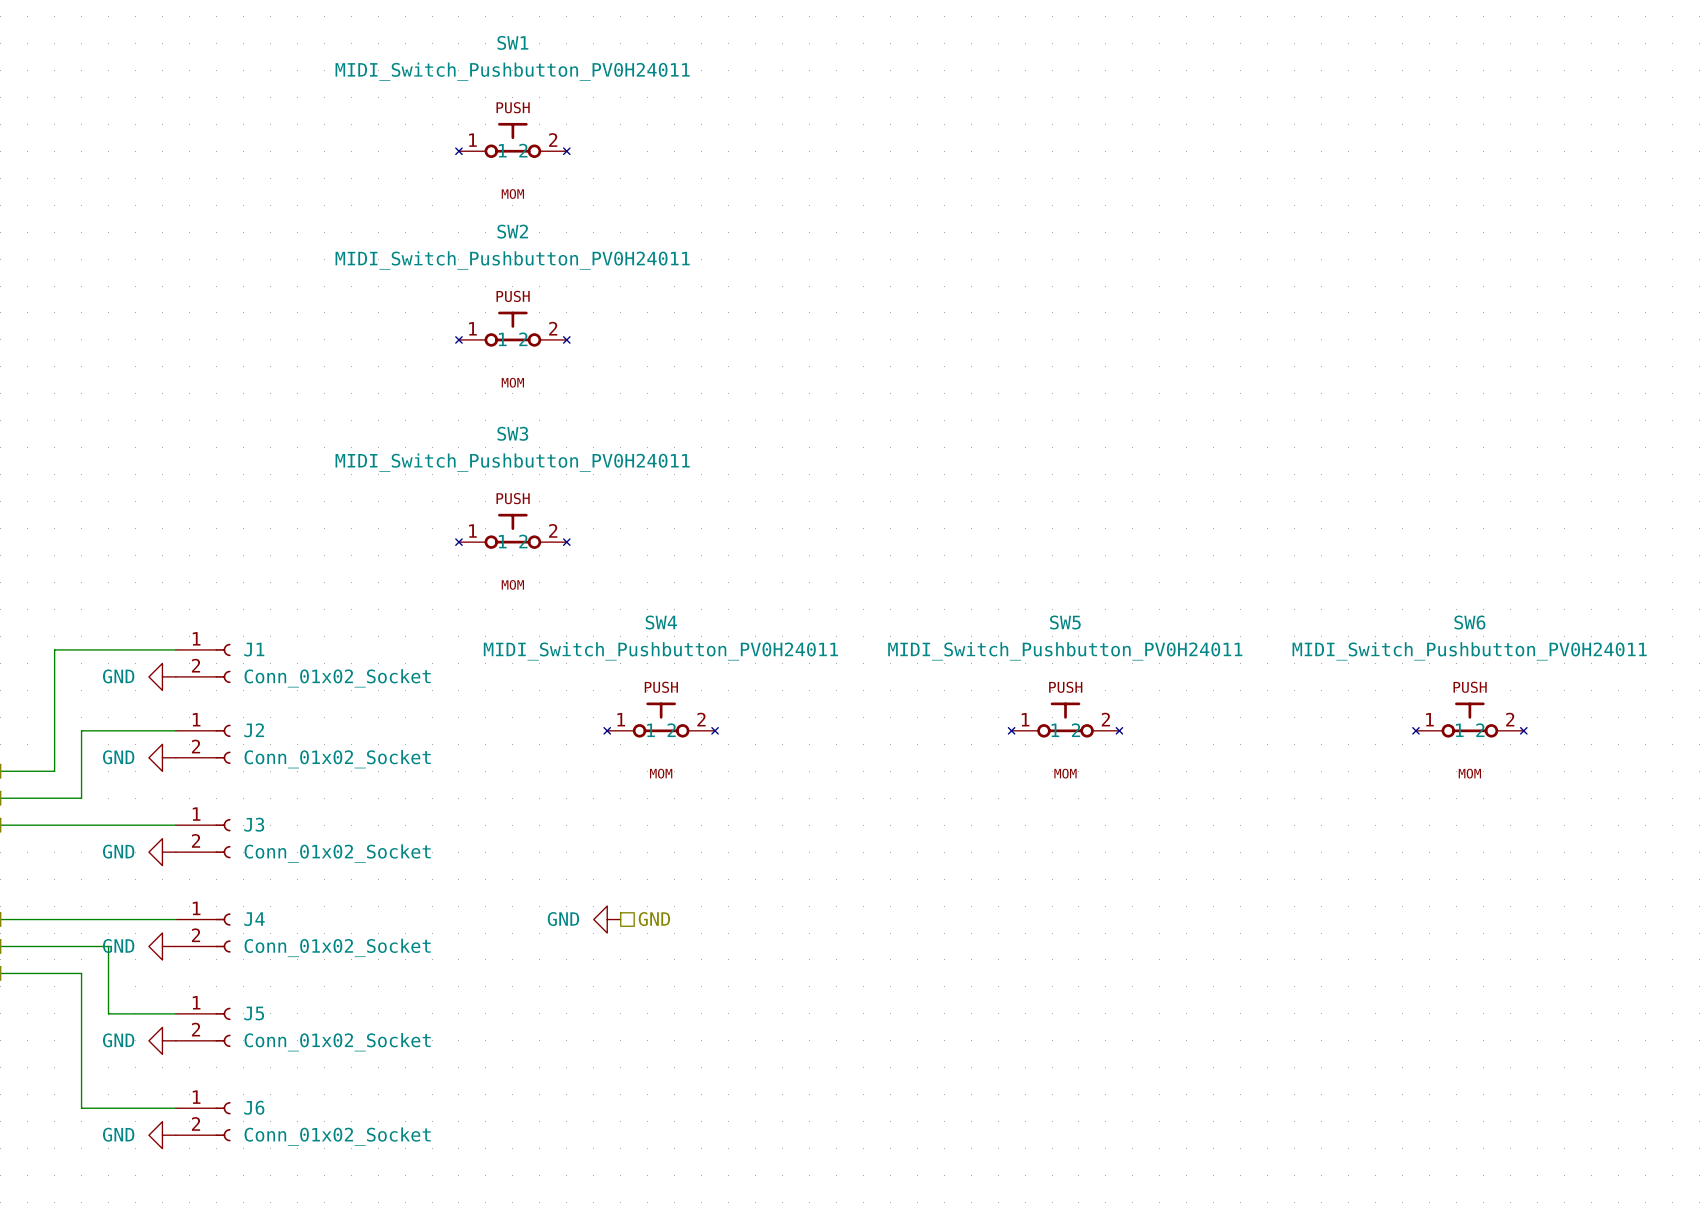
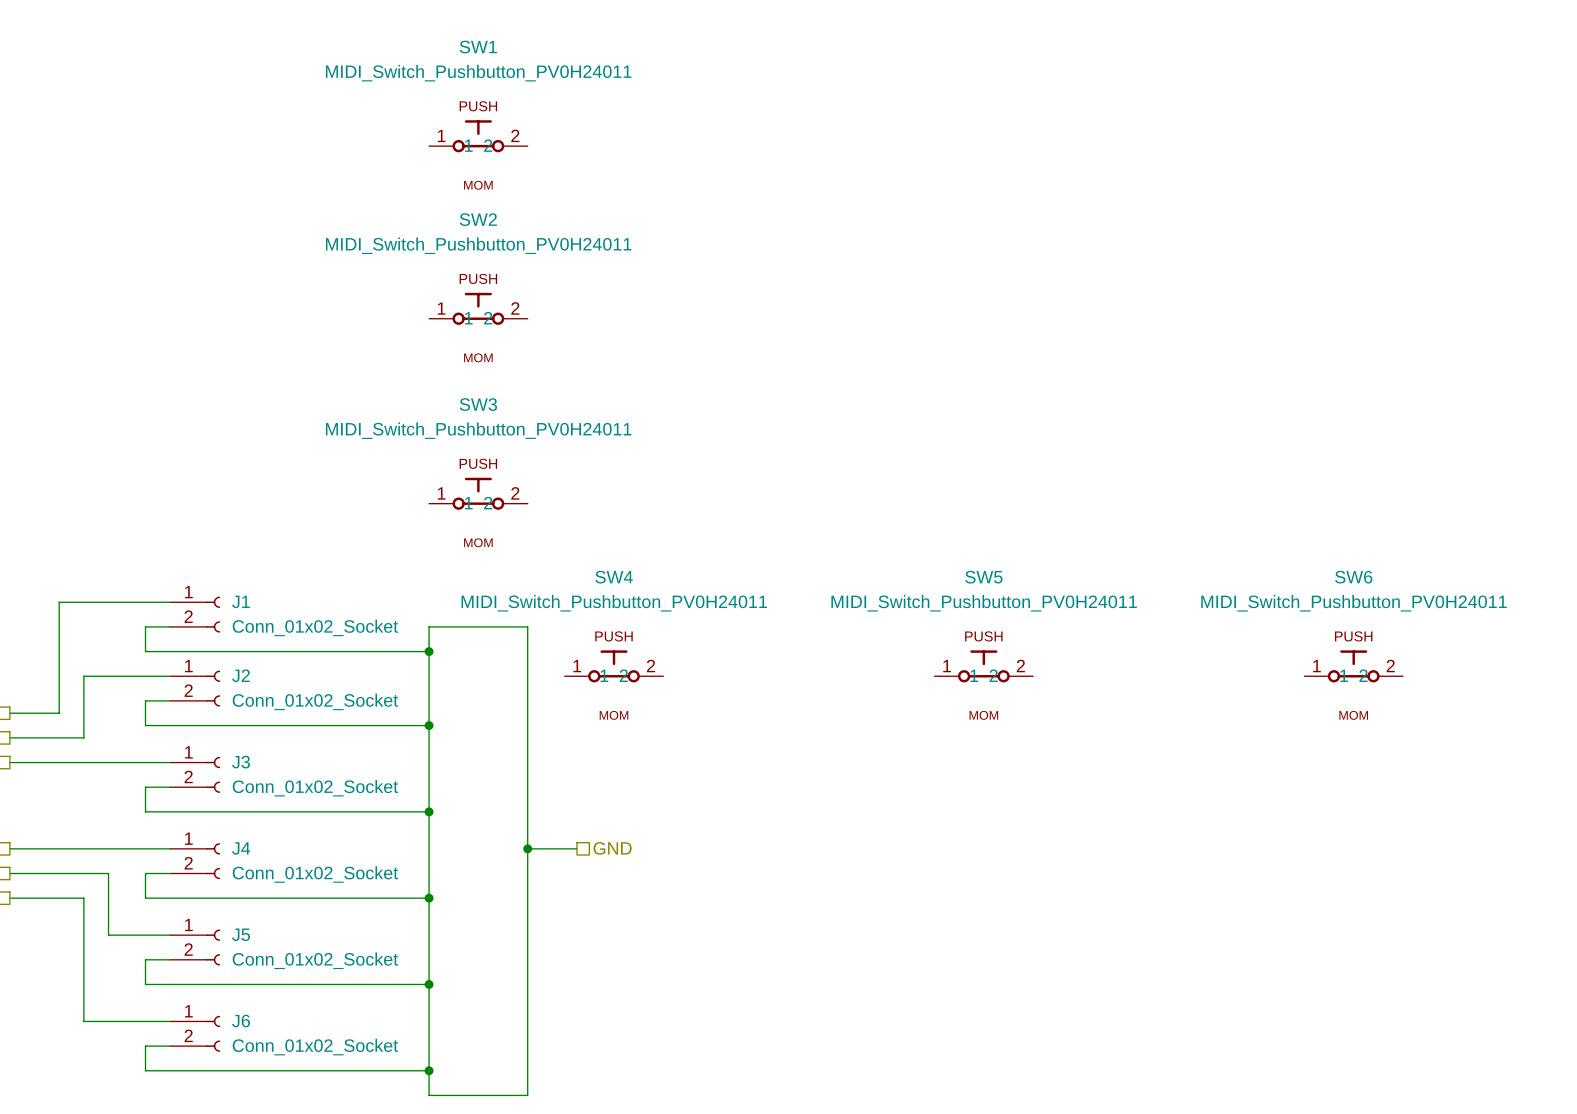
SW1 symbol: [455, 122, 570, 158] -> [429, 120, 528, 153]
SW2 symbol: [455, 311, 570, 347] -> [429, 292, 528, 325]
SW3 symbol: [455, 513, 570, 549] -> [429, 477, 528, 510]
power symbol: GND (162, 676) -> none
wire: none -> (170, 626) (145, 626) (145, 651) (429, 651)
wire: none -> (429, 626) (429, 1095) (527, 1095) (527, 626) (429, 626)
SW4 symbol: [604, 702, 719, 738] -> [564, 650, 664, 683]
SW5 symbol: [1008, 702, 1123, 738] -> [934, 650, 1034, 683]
SW6 symbol: [1412, 702, 1527, 738] -> [1304, 650, 1404, 683]
junction: none -> (429, 651)
power symbol: GND (162, 757) -> none
wire: none -> (170, 700) (145, 700) (145, 725) (429, 725)
junction: none -> (429, 725)
power symbol: GND (162, 852) -> none
wire: none -> (170, 787) (145, 787) (145, 811) (429, 811)
junction: none -> (429, 811)
wire: none -> (527, 848) (577, 848)
junction: none -> (527, 848)
power symbol: GND (607, 919) -> none
power symbol: GND (162, 946) -> none
wire: none -> (170, 873) (145, 873) (145, 898) (429, 898)
junction: none -> (429, 898)
power symbol: GND (162, 1040) -> none
wire: none -> (170, 959) (145, 959) (145, 984) (429, 984)
junction: none -> (429, 984)
power symbol: GND (162, 1135) -> none
wire: none -> (170, 1046) (145, 1046) (145, 1070) (429, 1070)
junction: none -> (429, 1070)

